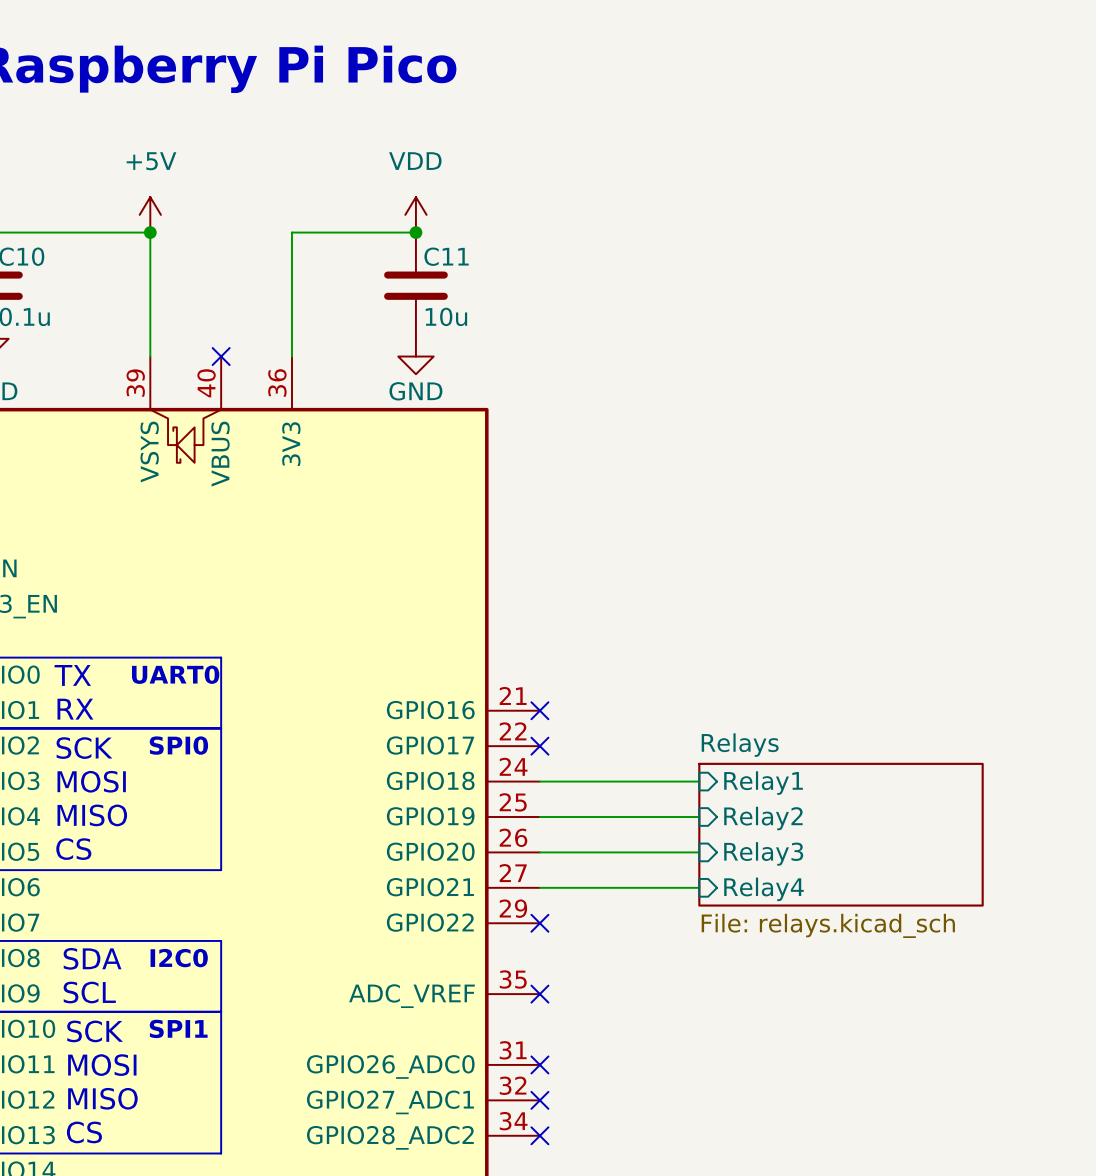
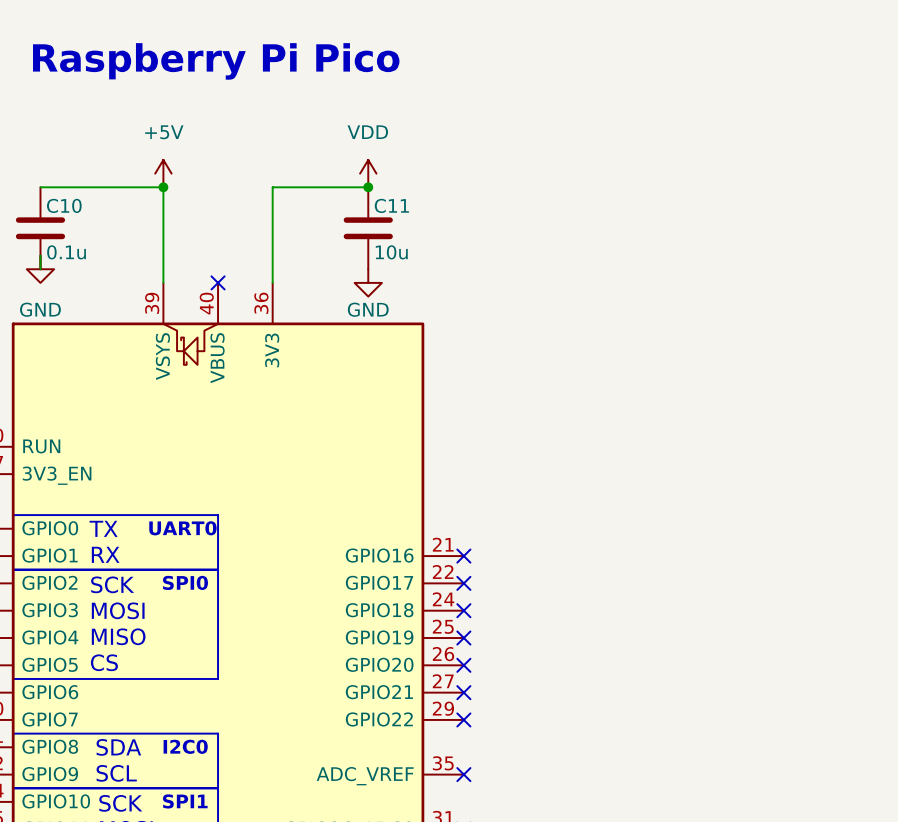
wire: (539, 781) (699, 781) -> none
no-connect mark: none -> (463, 610)
sheet pin: Relay1 (763, 783) -> none
wire: (539, 816) (699, 816) -> none
no-connect mark: none -> (463, 638)
sheet pin: Relay2 (763, 818) -> none
sheet Relays: File: relays.kicad_sch (841, 834) -> none
wire: (539, 852) (699, 852) -> none
no-connect mark: none -> (463, 665)
sheet pin: Relay3 (763, 853) -> none
wire: (539, 887) (699, 887) -> none
no-connect mark: none -> (463, 692)
sheet pin: Relay4 (763, 889) -> none

